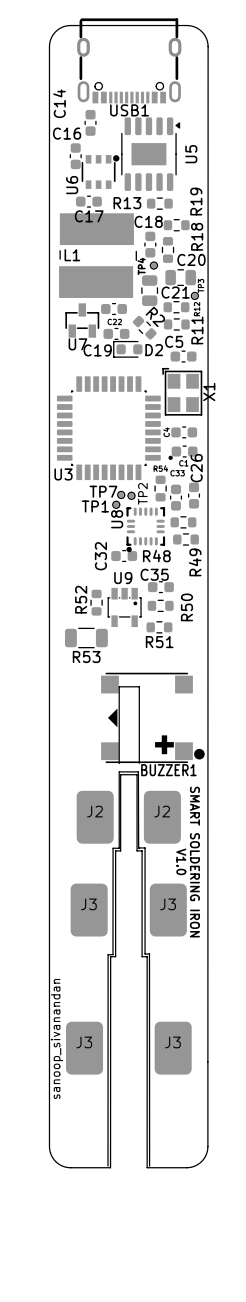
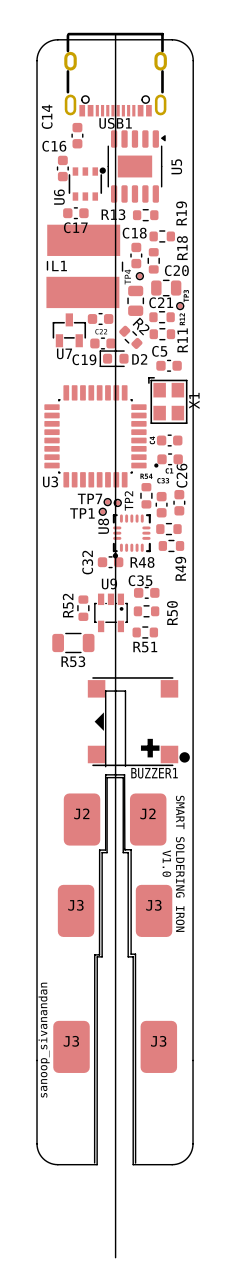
line: none -> (115, 34) (115, 1257)

